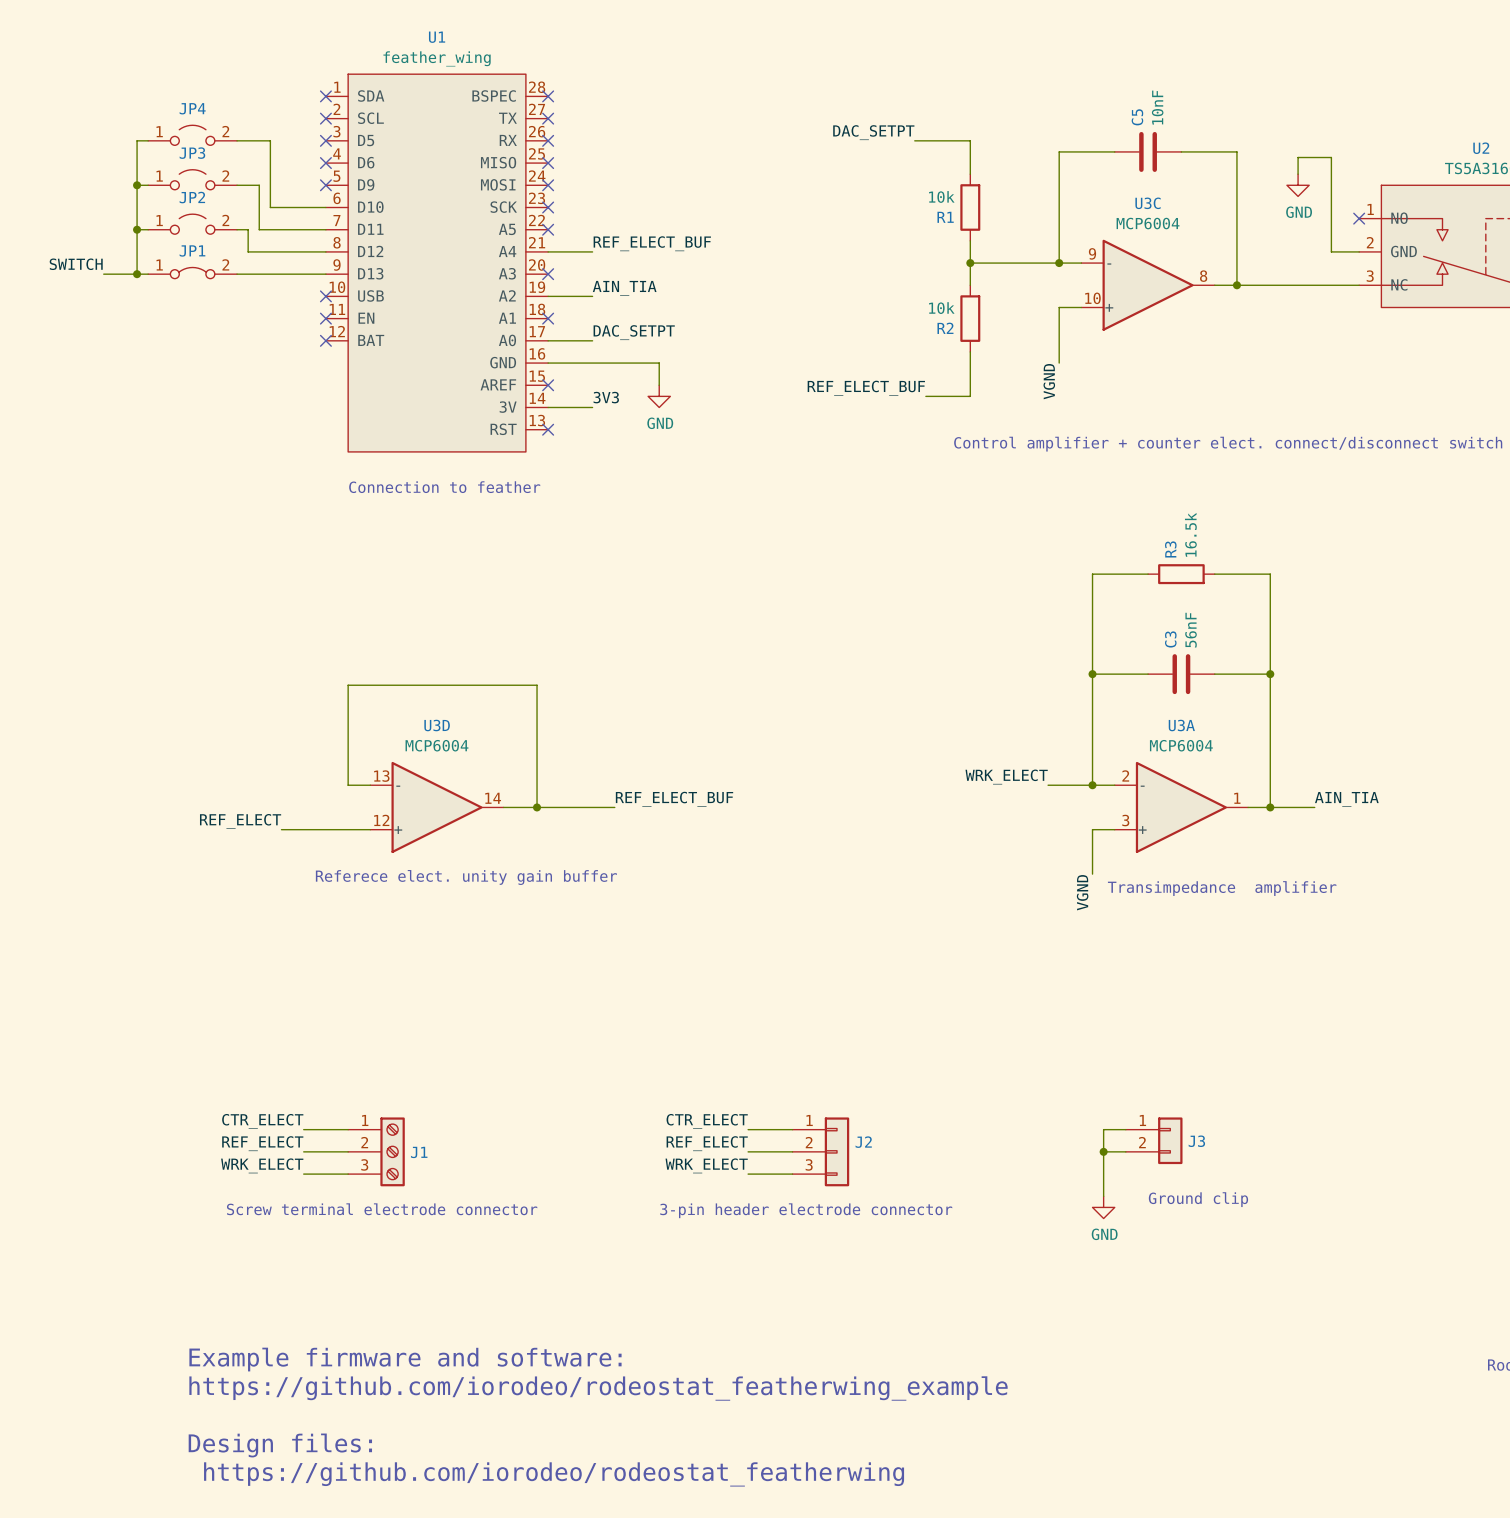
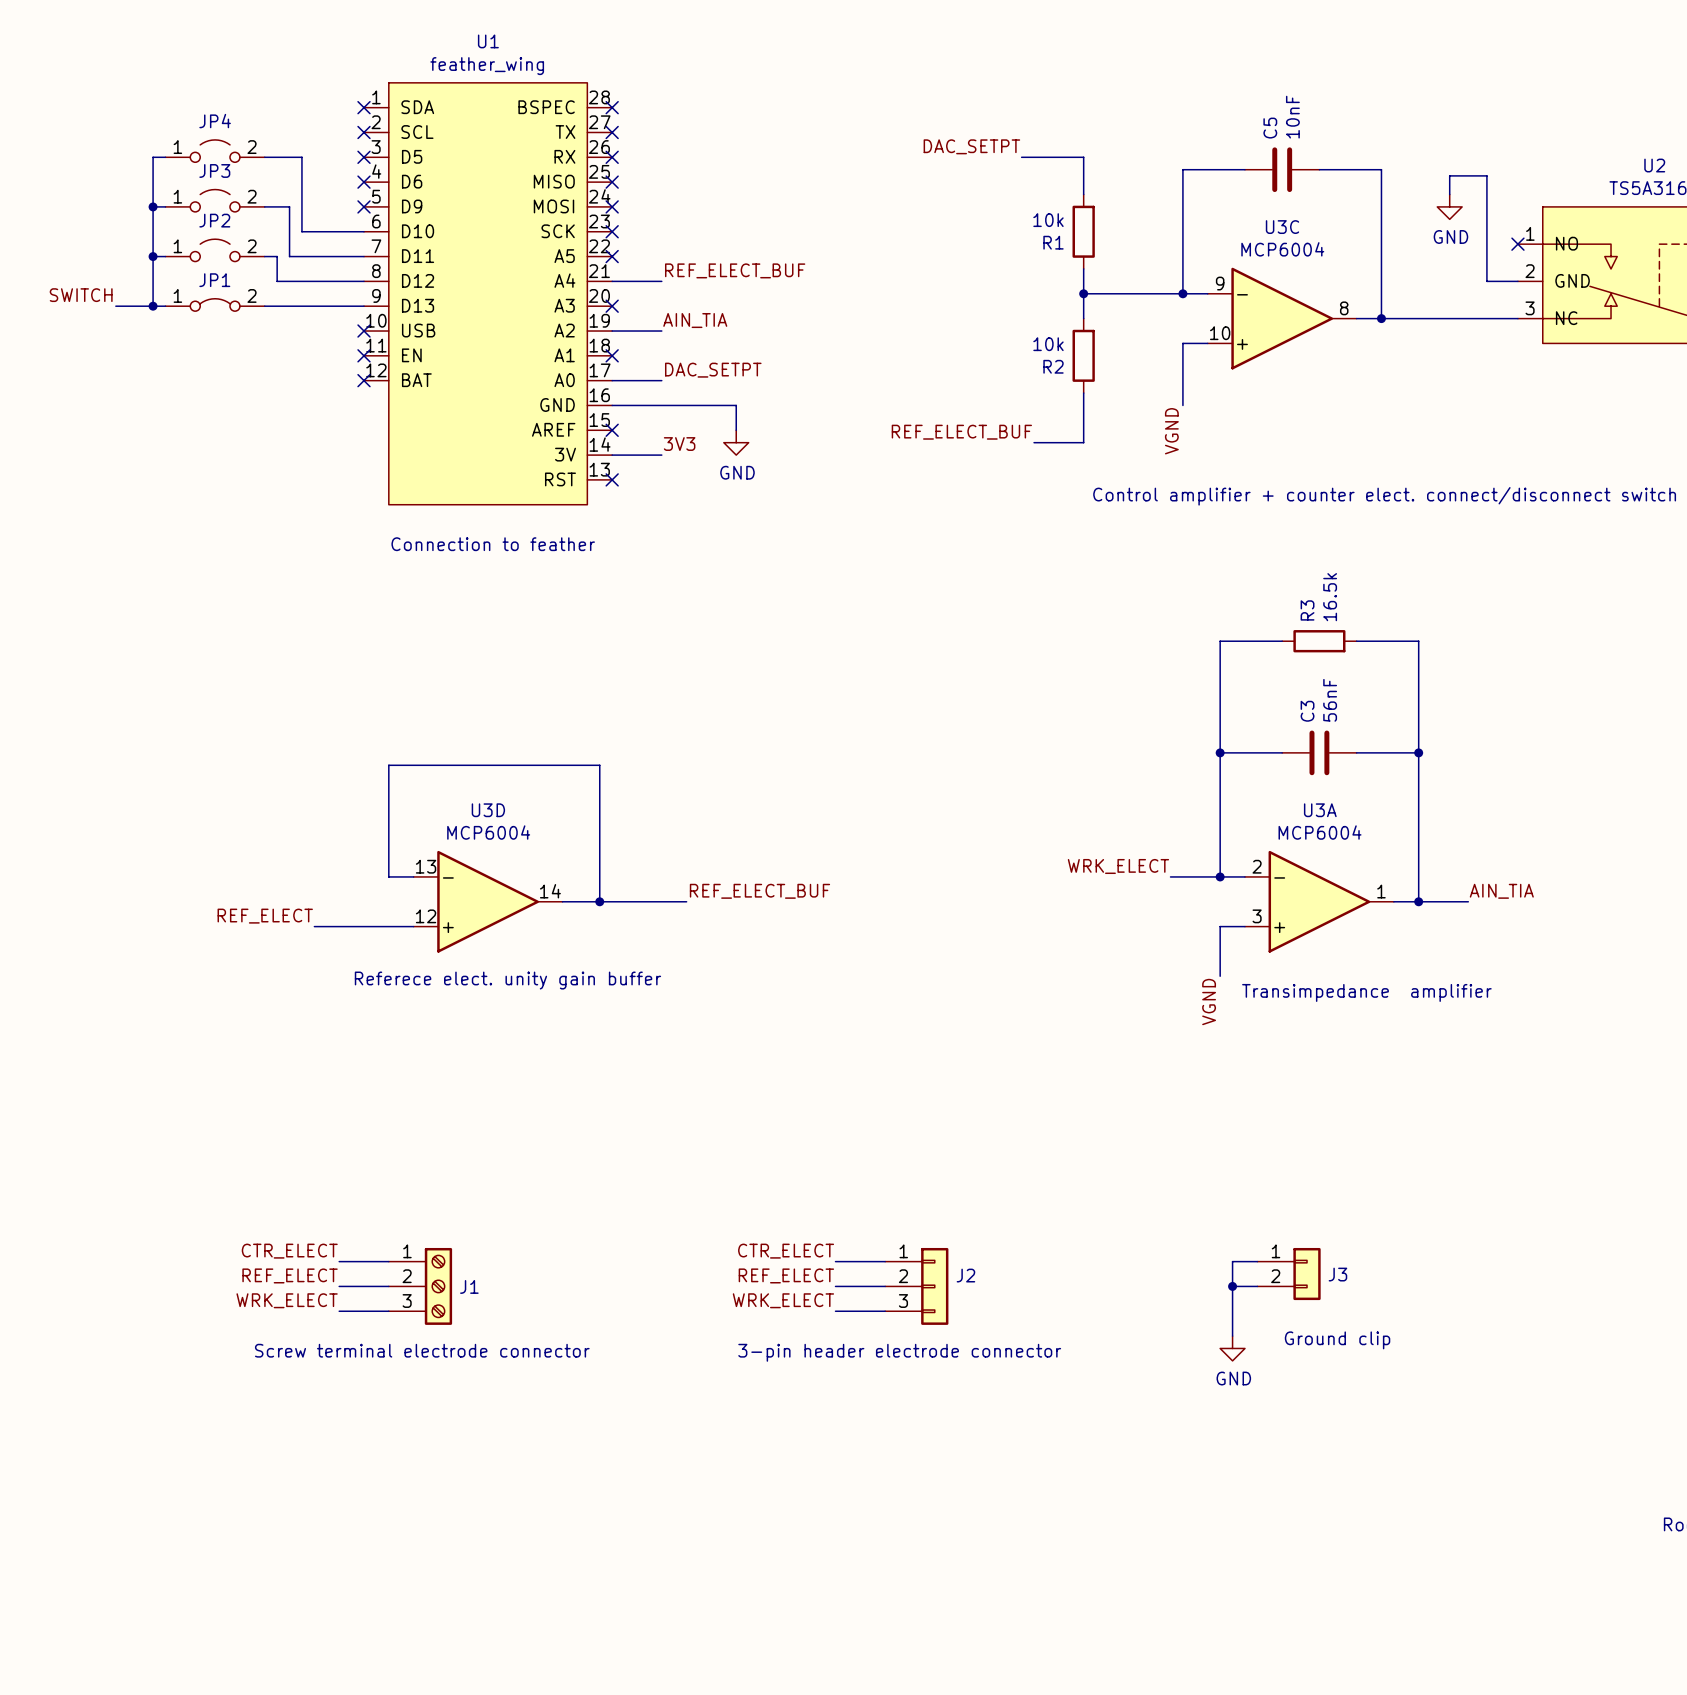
text: Example firmware and software: (405, 1359) -> none
text: https://github.com/iorodeo/rodeostat_featherwing_example (598, 1388) -> none
text: Design files: (280, 1445) -> none
text: https://github.com/iorodeo/rodeostat_featherwing (554, 1474) -> none

